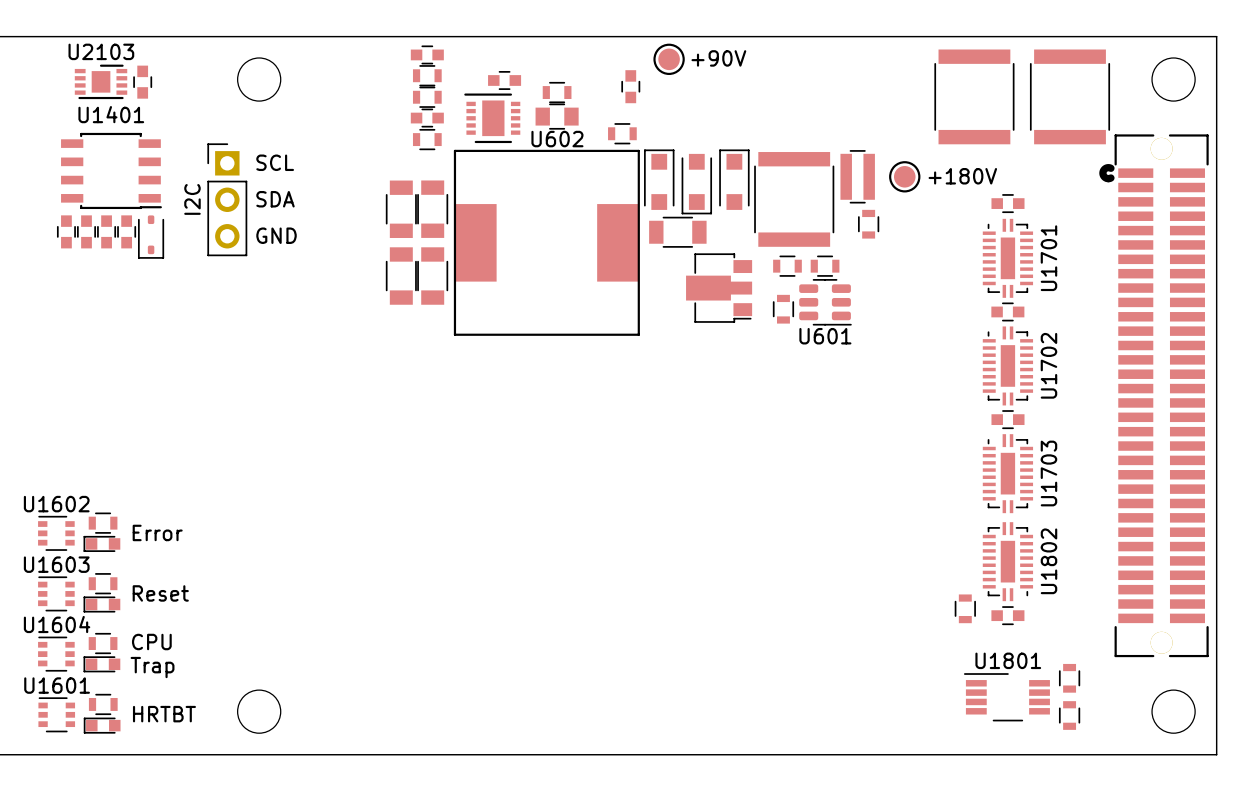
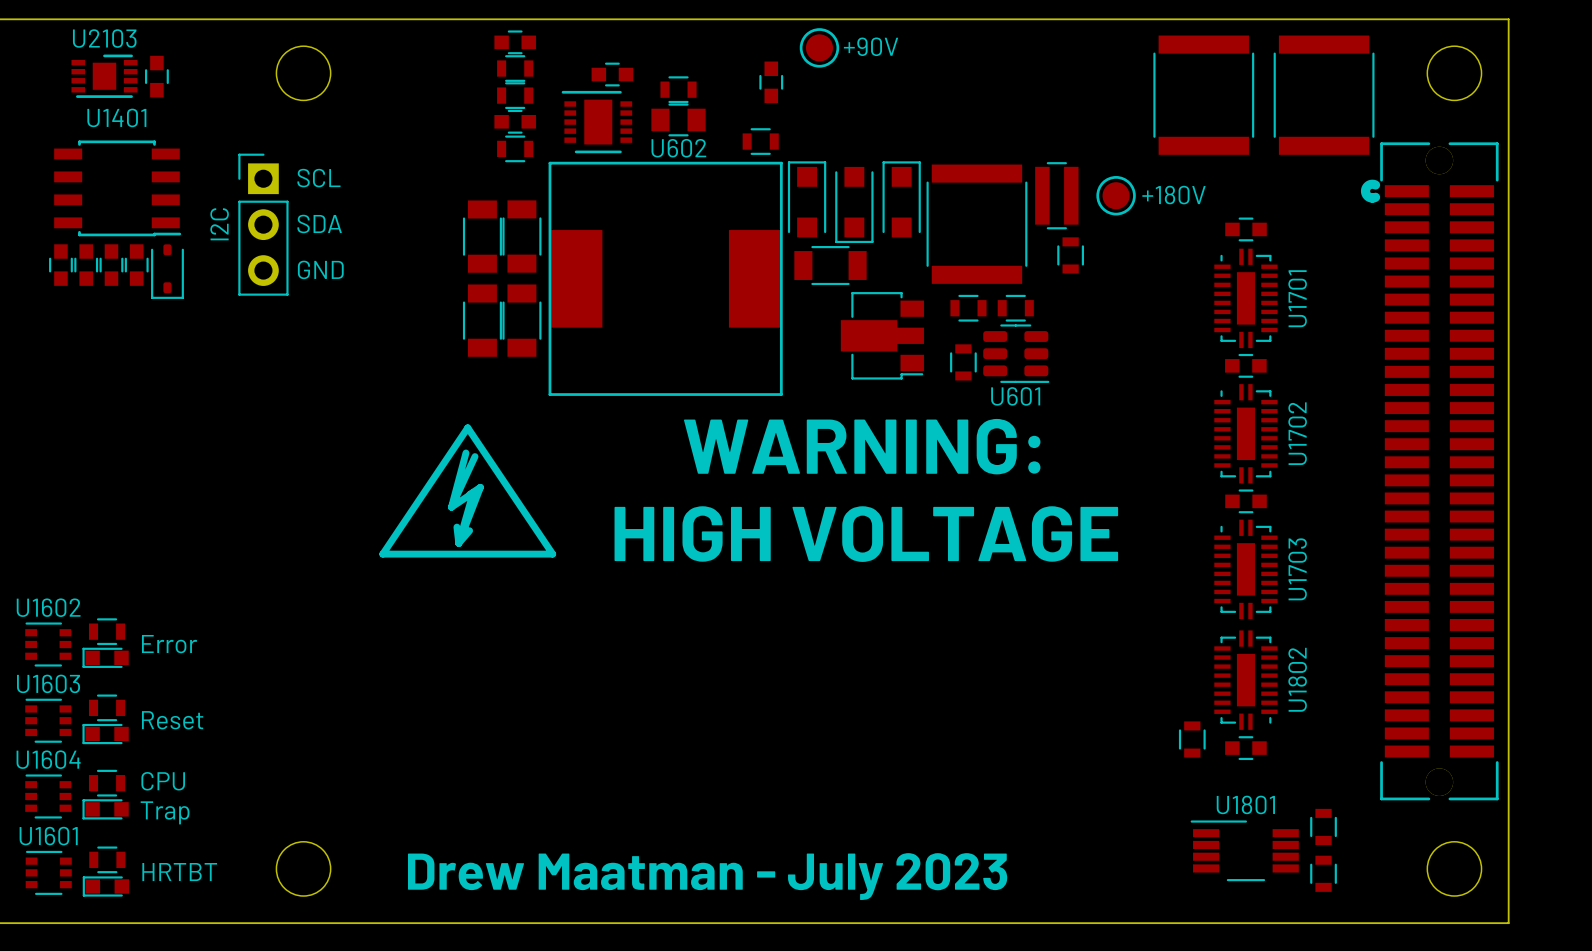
drawing: none -> [379, 424, 557, 558]
text: none -> WARNING: (862, 446)
text: none -> HIGH VOLTAGE (866, 534)
text: none -> Drew Maatman - July 2023 (707, 876)

